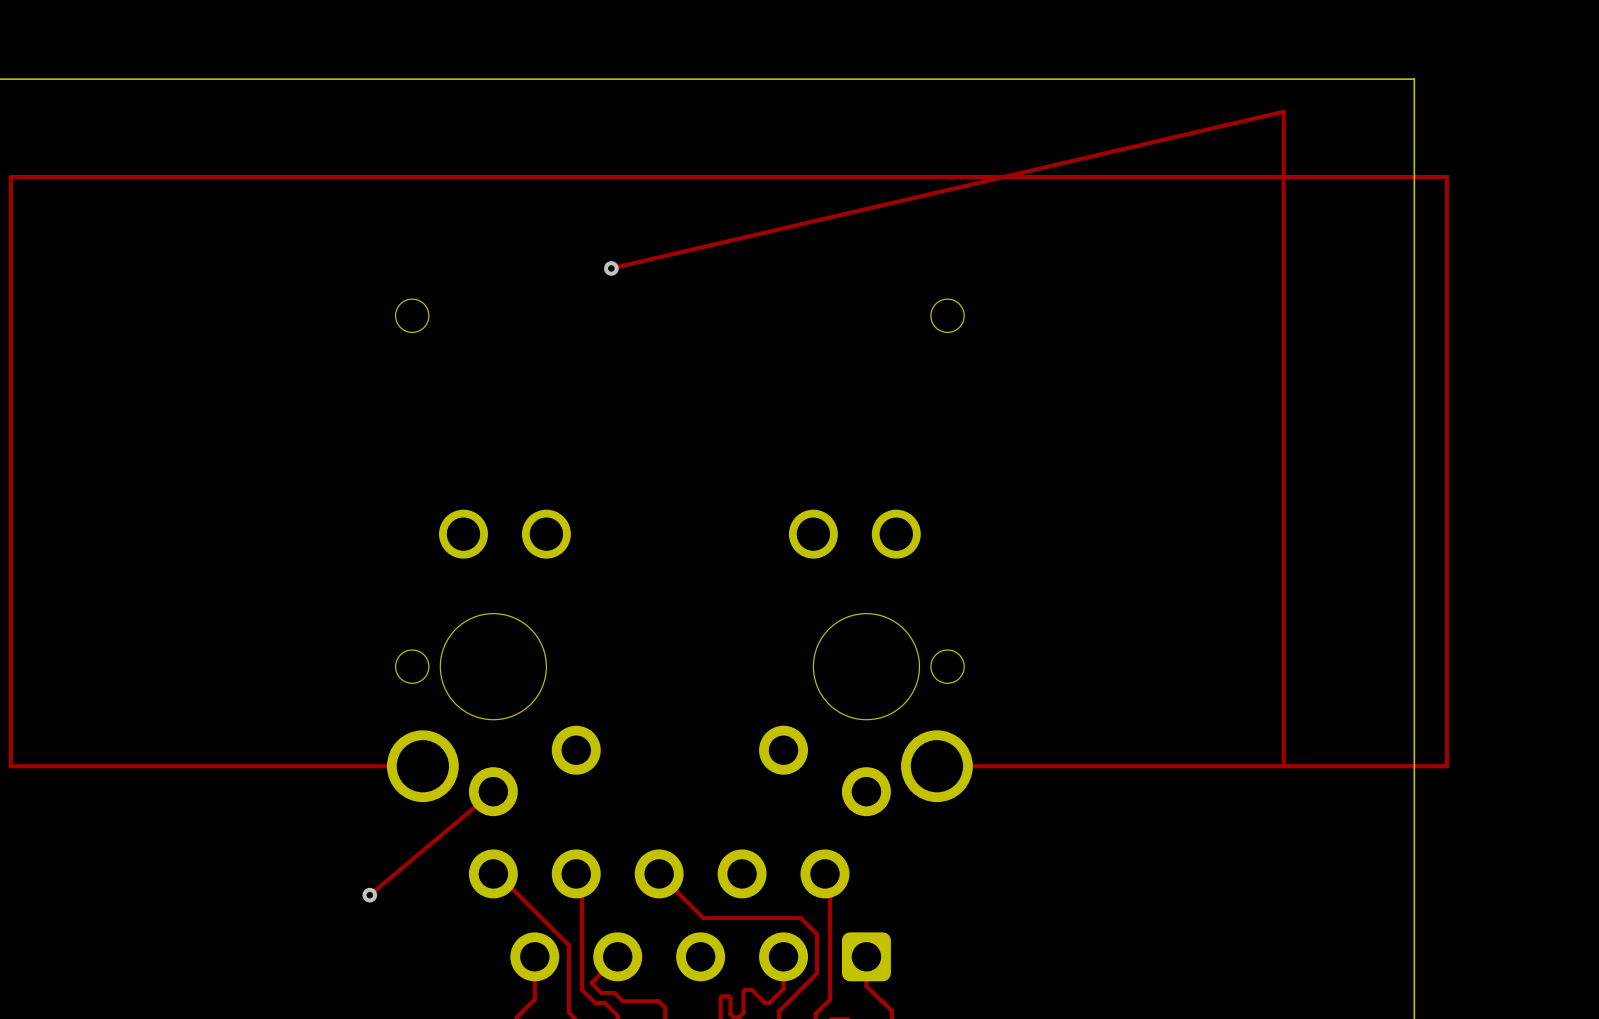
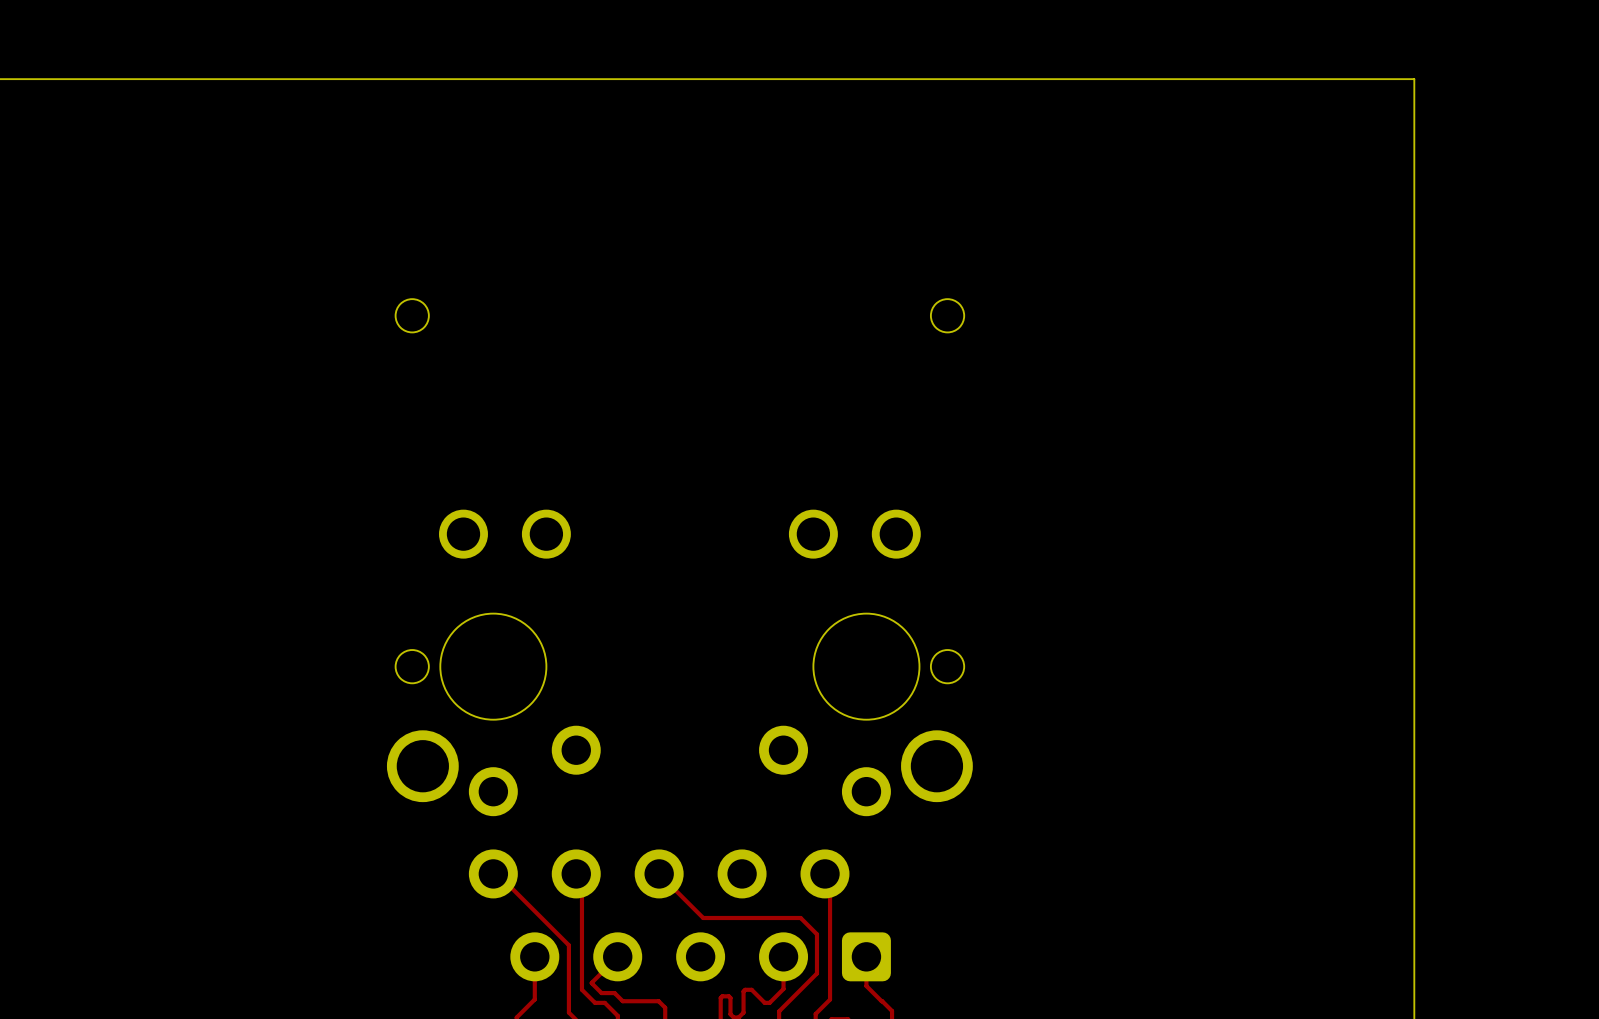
track: (611, 268) (1283, 111) (1283, 766) -> none
via: (611, 268) -> none
track: (422, 766) (10, 766) (10, 177) (1446, 177) (1446, 766) (936, 766) -> none
track: (493, 791) (369, 895) -> none
via: (369, 895) -> none

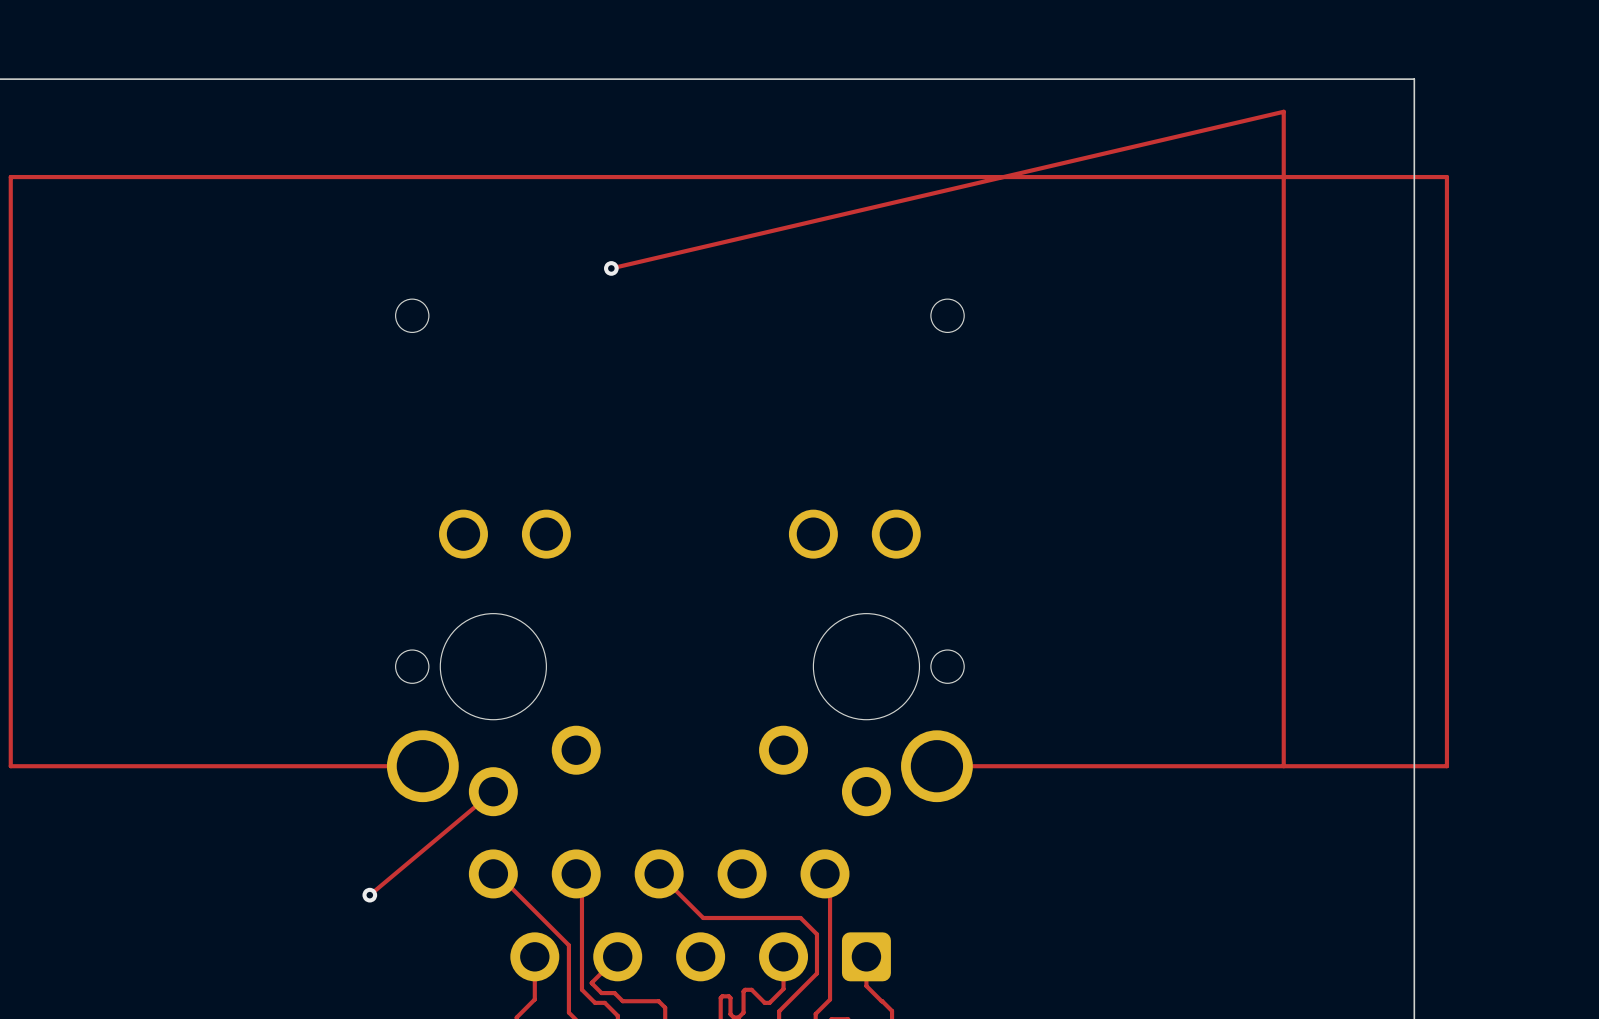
track: none -> (611, 268) (1283, 111) (1283, 766)
via: none -> (611, 268)
track: none -> (422, 766) (10, 766) (10, 177) (1446, 177) (1446, 766) (936, 766)
track: none -> (493, 791) (369, 895)
via: none -> (369, 895)

